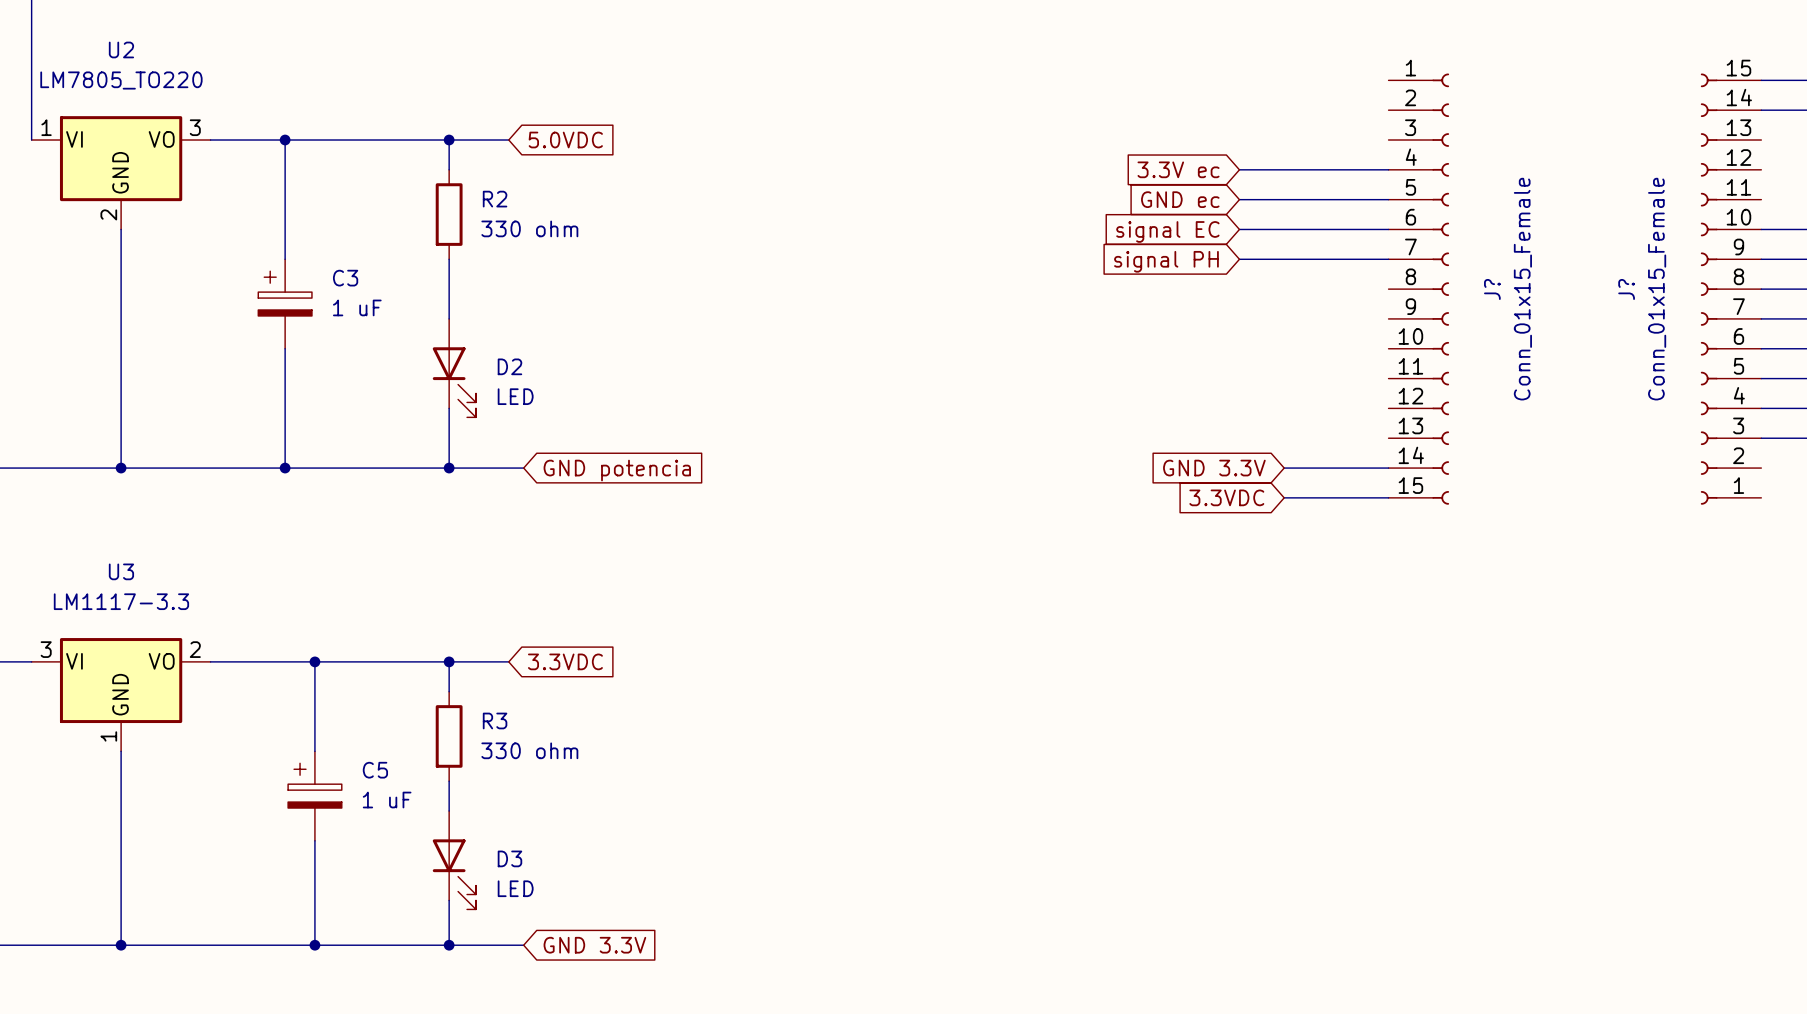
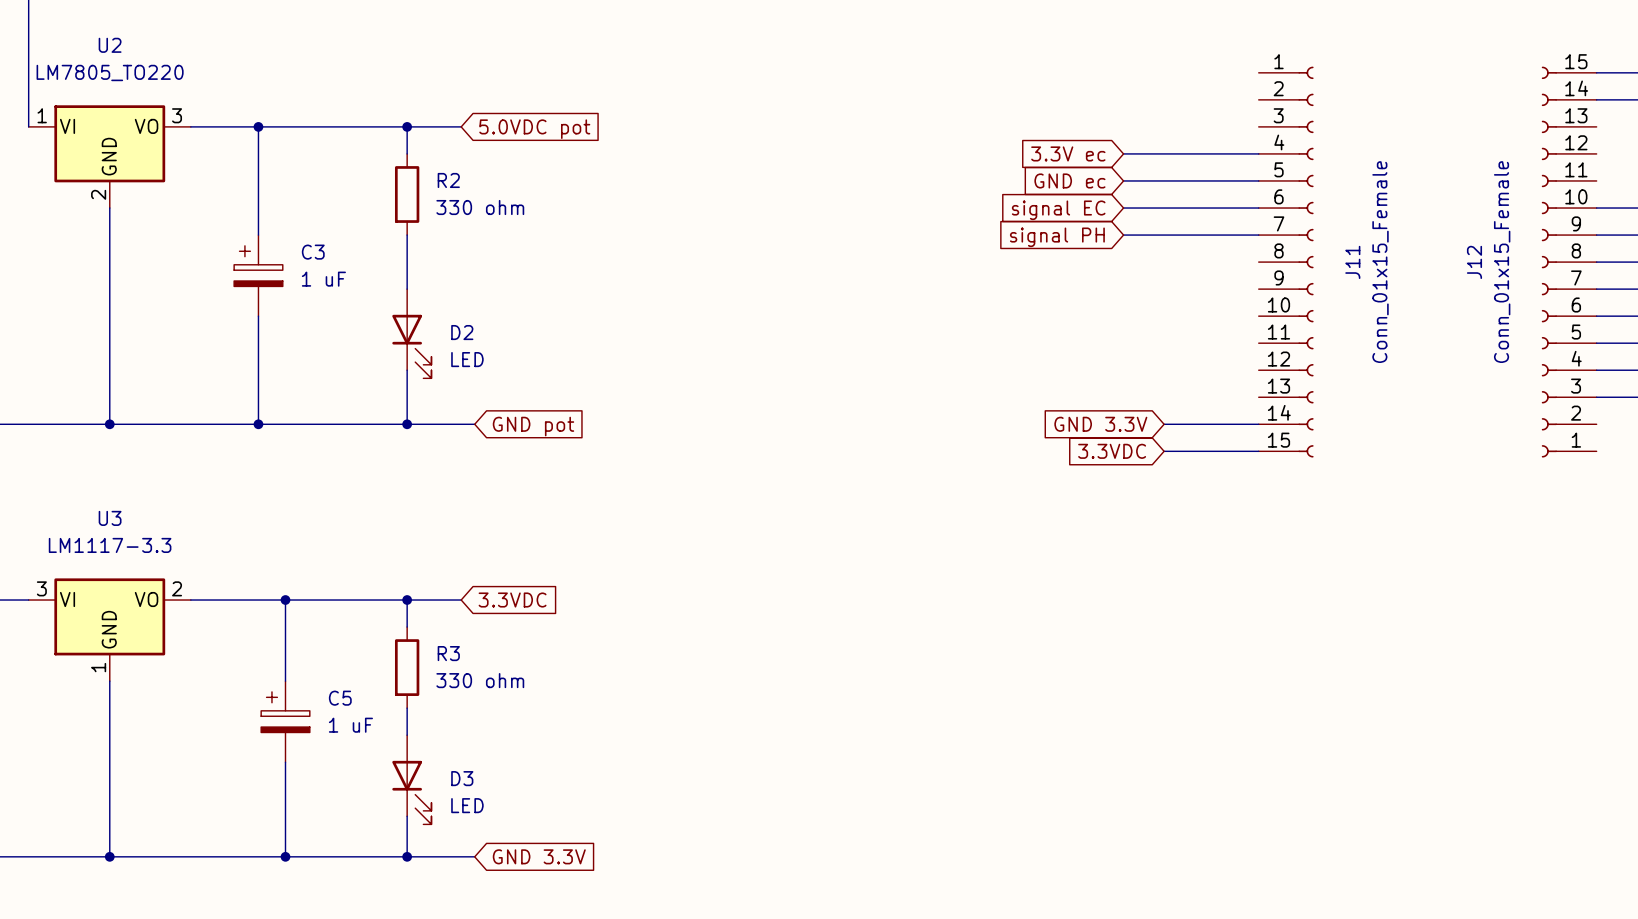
global label: 5.0VDC (565, 140) -> 5.0VDC pot (534, 129)
J? name: J? (1492, 289) -> J11 (1352, 262)
J? name: J? (1626, 289) -> J12 (1474, 262)
global label: GND potencia (617, 470) -> GND pot (533, 426)

